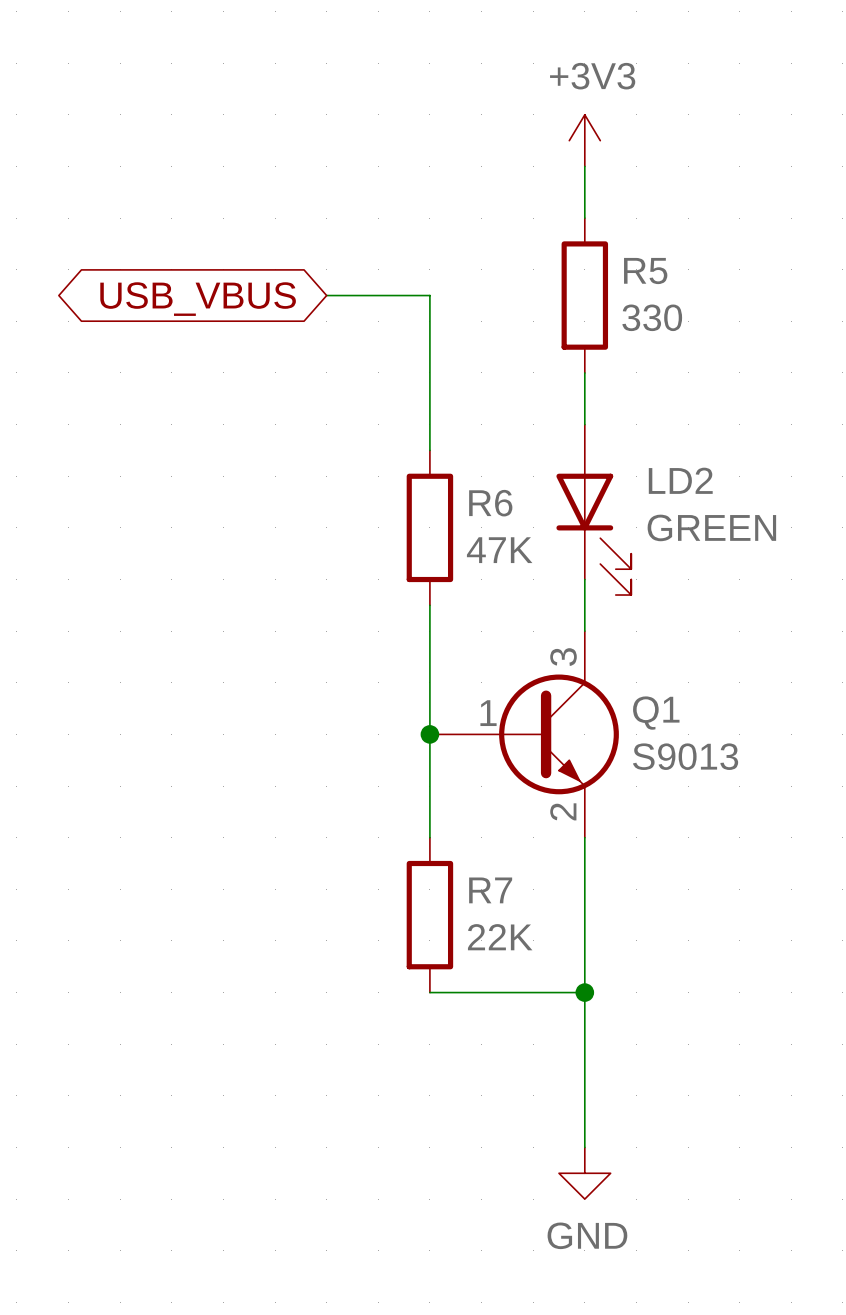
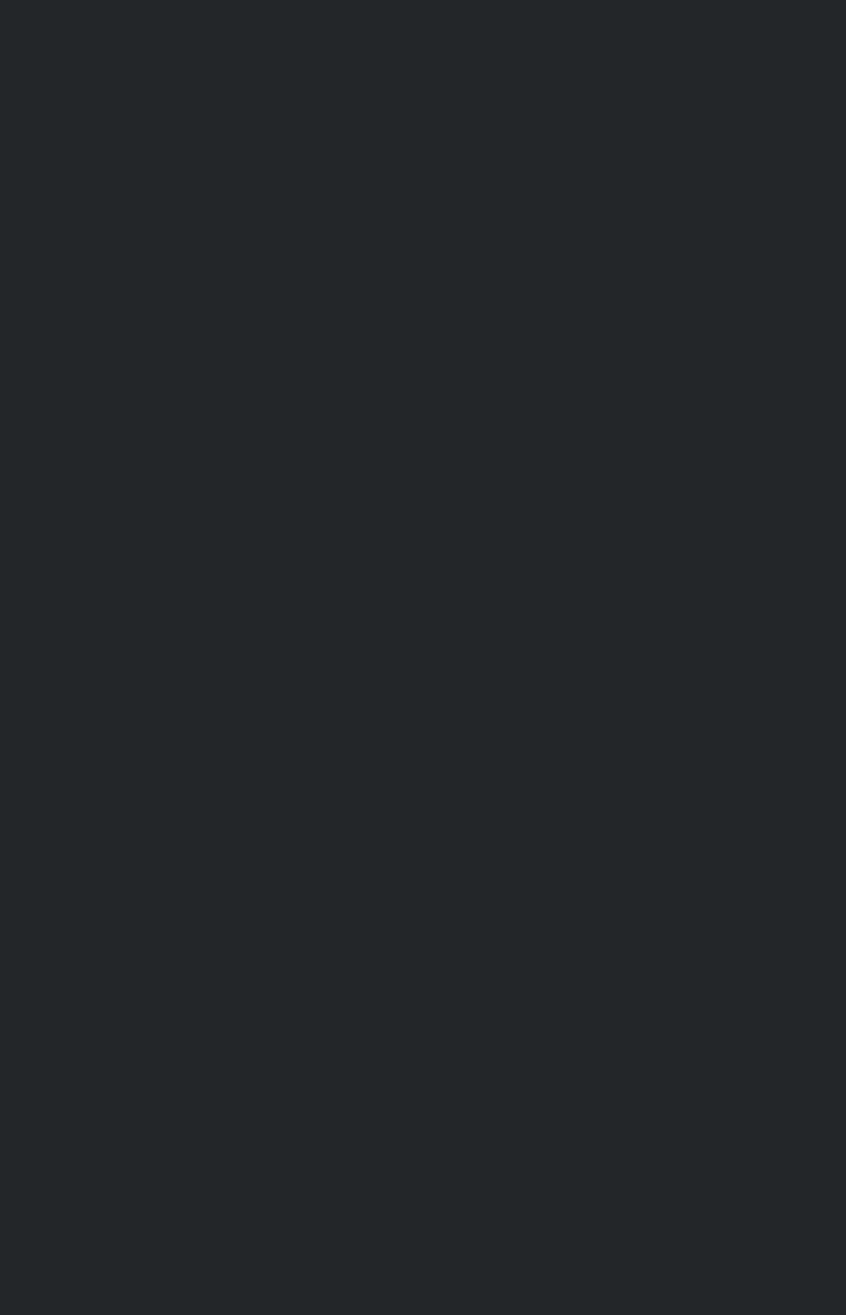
power symbol: +3V3 (584, 140) -> none
wire: (584, 166) (584, 218) -> none
wire: (326, 295) (429, 295) (429, 450) -> none
R5: 330 (584, 295) -> none
global label: USB_VBUS (198, 299) -> none
wire: (584, 372) (584, 424) -> none
LD2: GREEN (593, 509) -> none
R6: 47K (429, 527) -> none
wire: (584, 579) (584, 631) -> none
wire: (429, 605) (429, 837) -> none
junction: (429, 734) -> none
Q1: S9013 (524, 734) -> none
wire: (584, 837) (584, 1147) -> none
R7: 22K (429, 915) -> none
wire: (429, 992) (584, 992) -> none
junction: (584, 992) -> none
power symbol: GND (584, 1173) -> none

